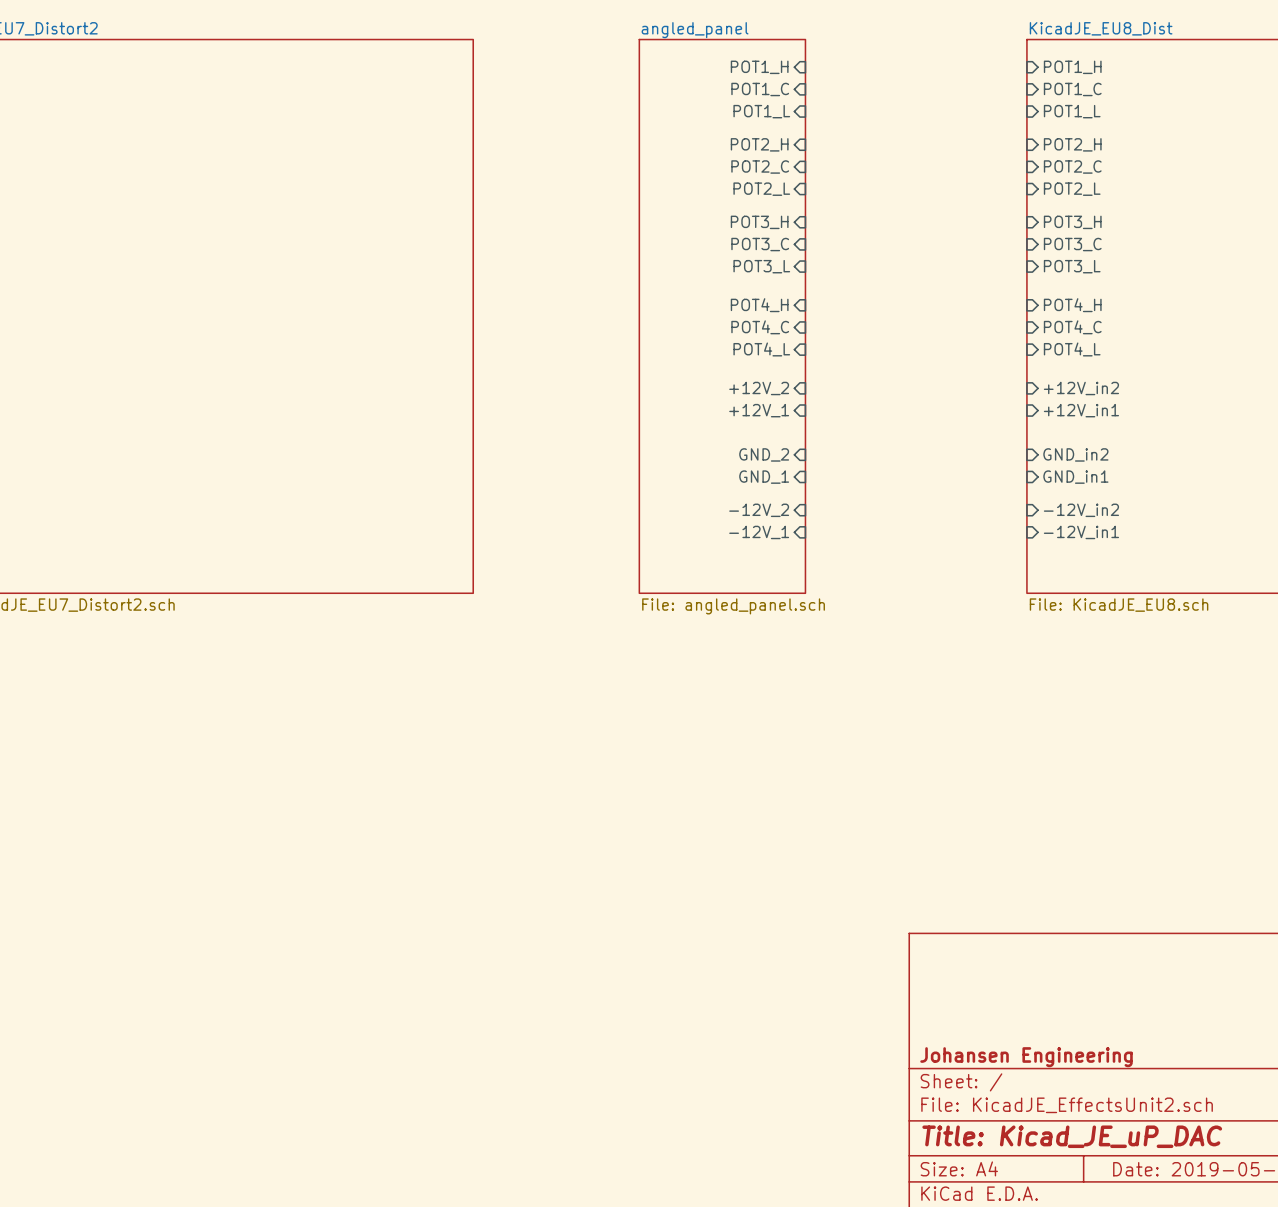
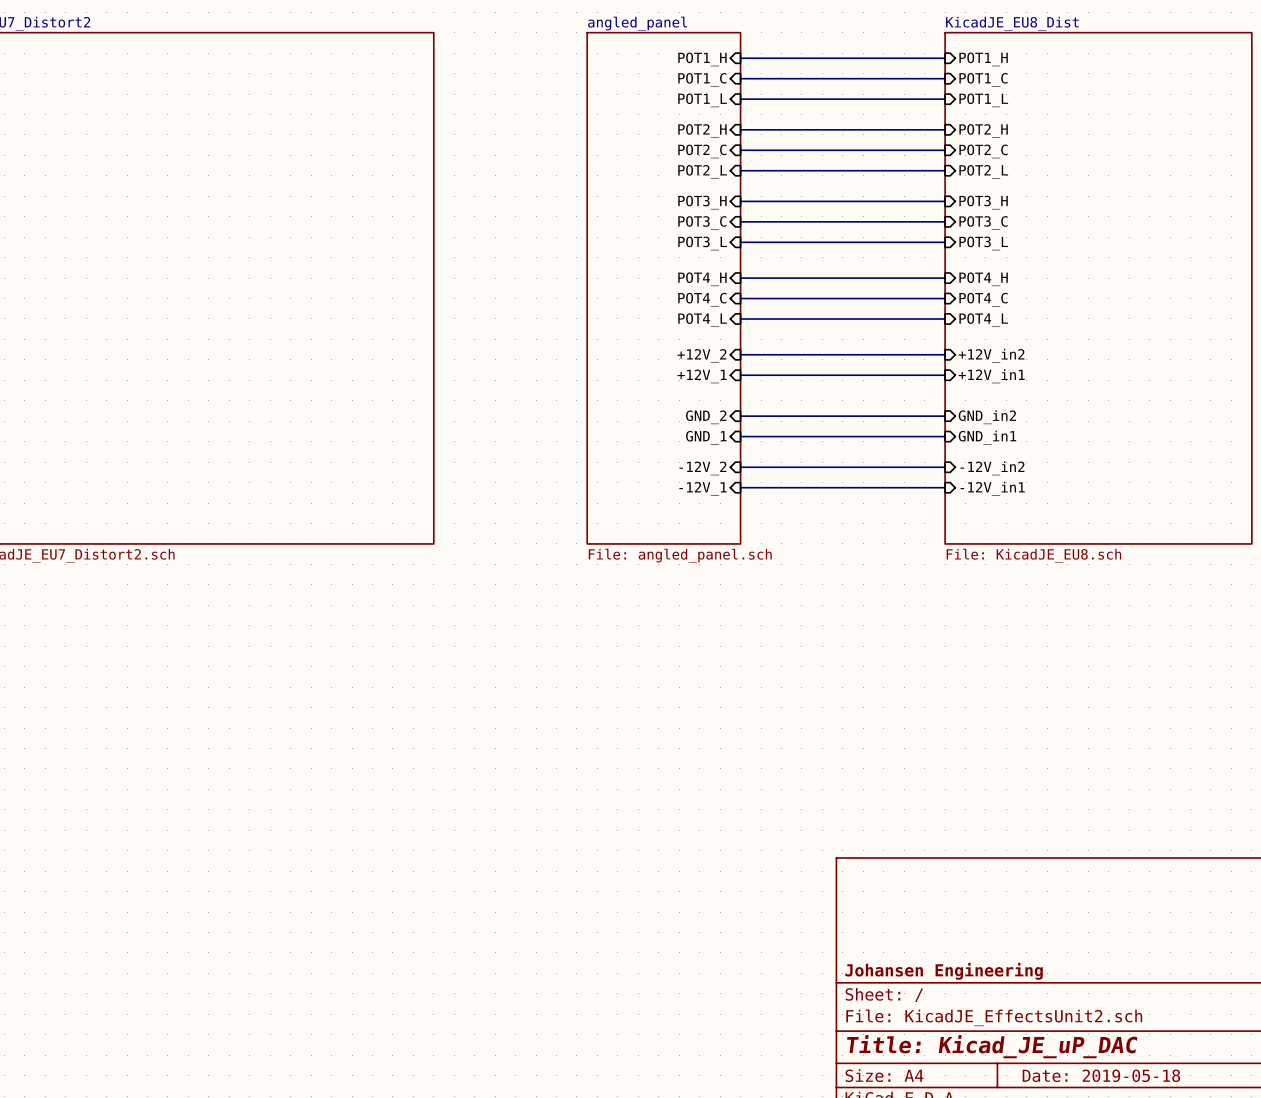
wire: none -> (740, 58) (945, 58)
wire: none -> (740, 78) (945, 78)
wire: none -> (740, 99) (945, 99)
wire: none -> (740, 129) (945, 129)
wire: none -> (740, 150) (945, 150)
wire: none -> (740, 170) (945, 170)
wire: none -> (740, 201) (945, 201)
wire: none -> (740, 221) (945, 221)
wire: none -> (740, 242) (945, 242)
wire: none -> (740, 278) (945, 278)
wire: none -> (740, 298) (945, 298)
wire: none -> (740, 318) (945, 318)
wire: none -> (740, 354) (945, 354)
wire: none -> (740, 375) (945, 375)
wire: none -> (740, 416) (945, 416)
wire: none -> (740, 436) (945, 436)
wire: none -> (740, 467) (945, 467)
wire: none -> (740, 487) (945, 487)

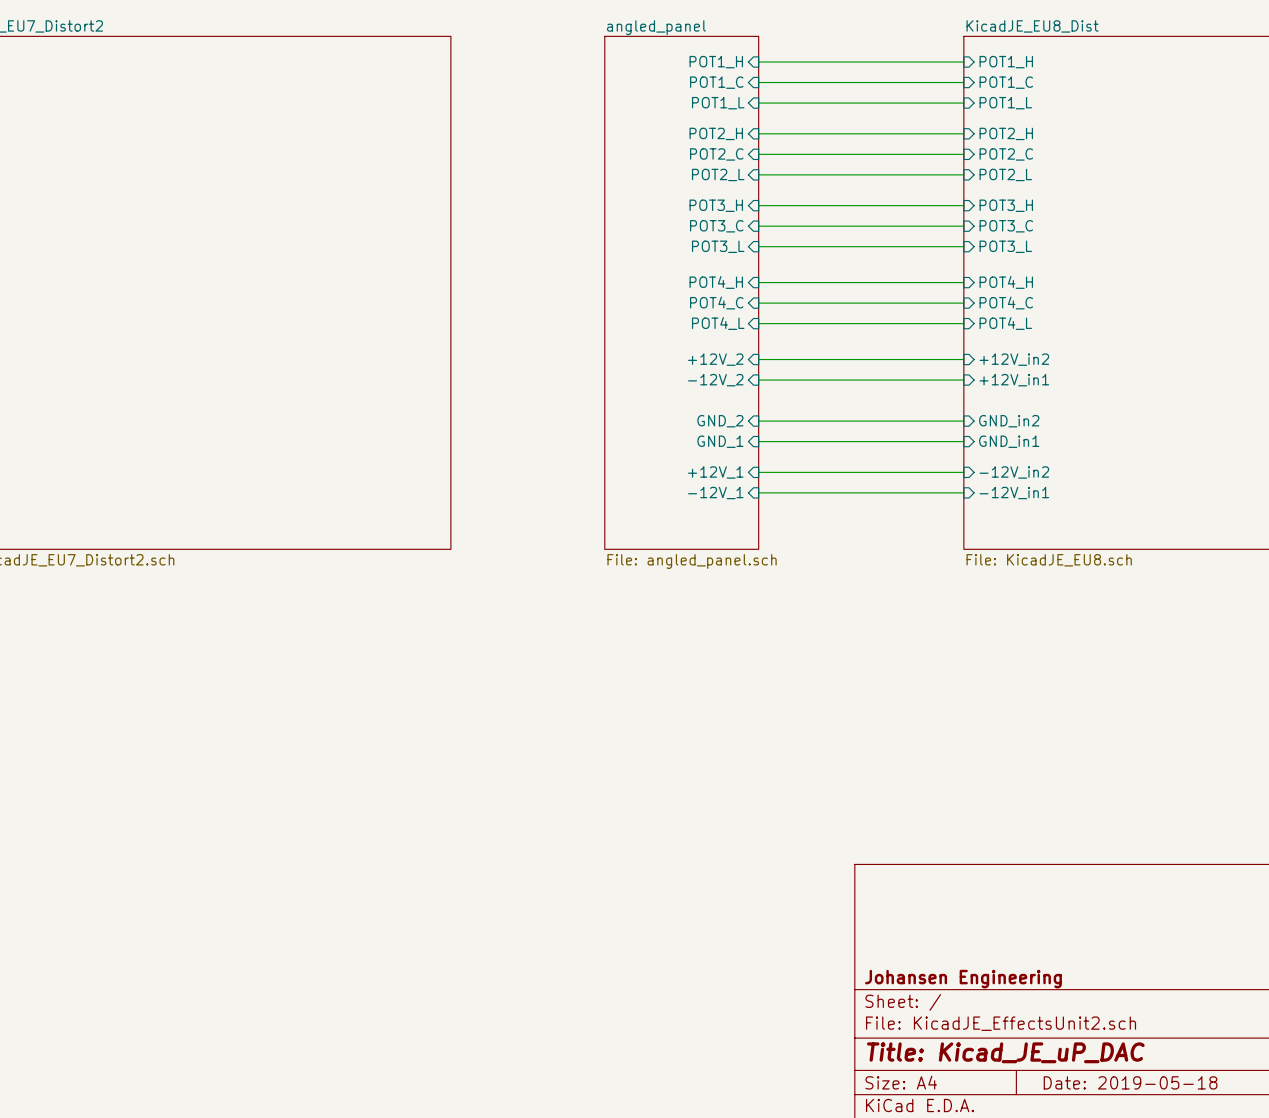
sheet pin: +12V_1 (702, 376) -> -12V_2 (715, 380)
sheet pin: -12V_2 (702, 468) -> +12V_1 (715, 472)

